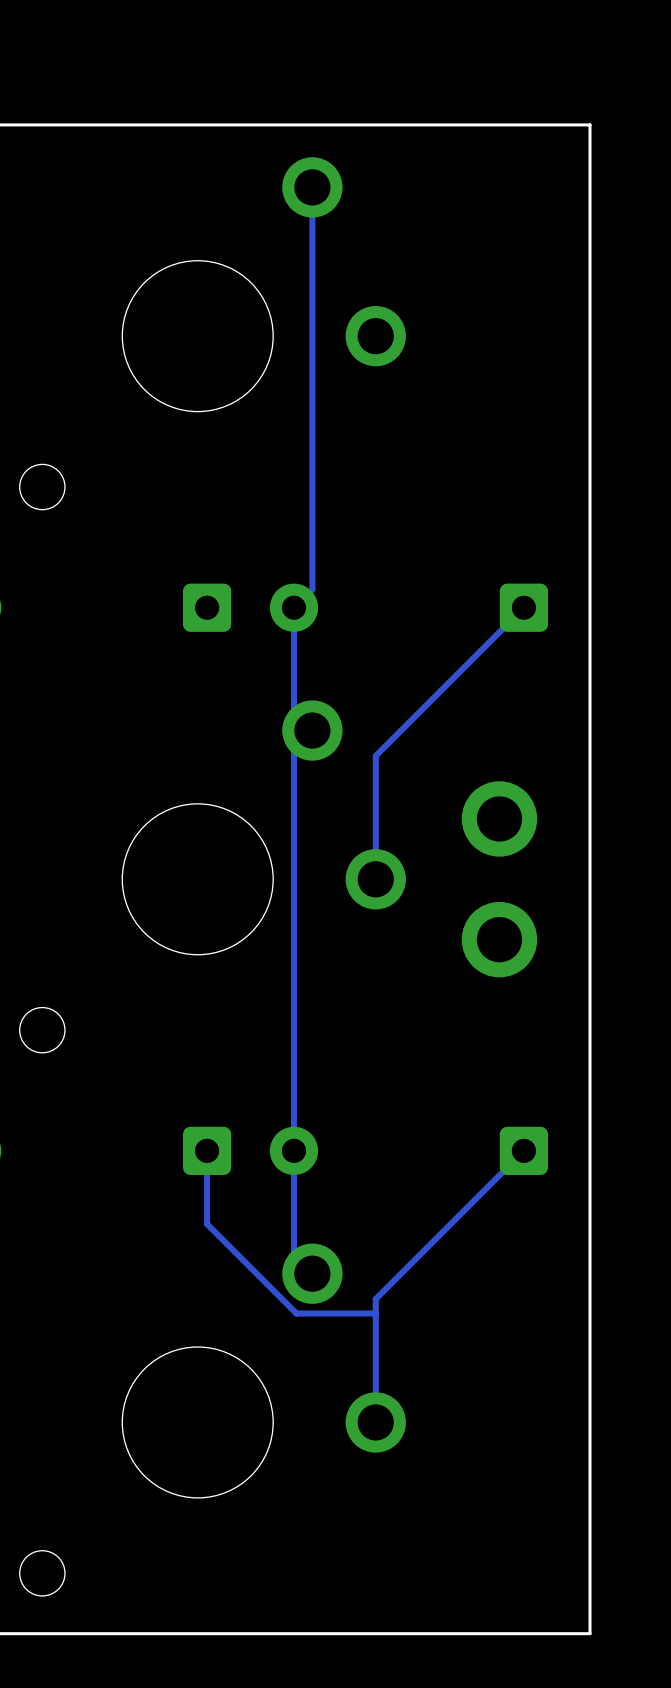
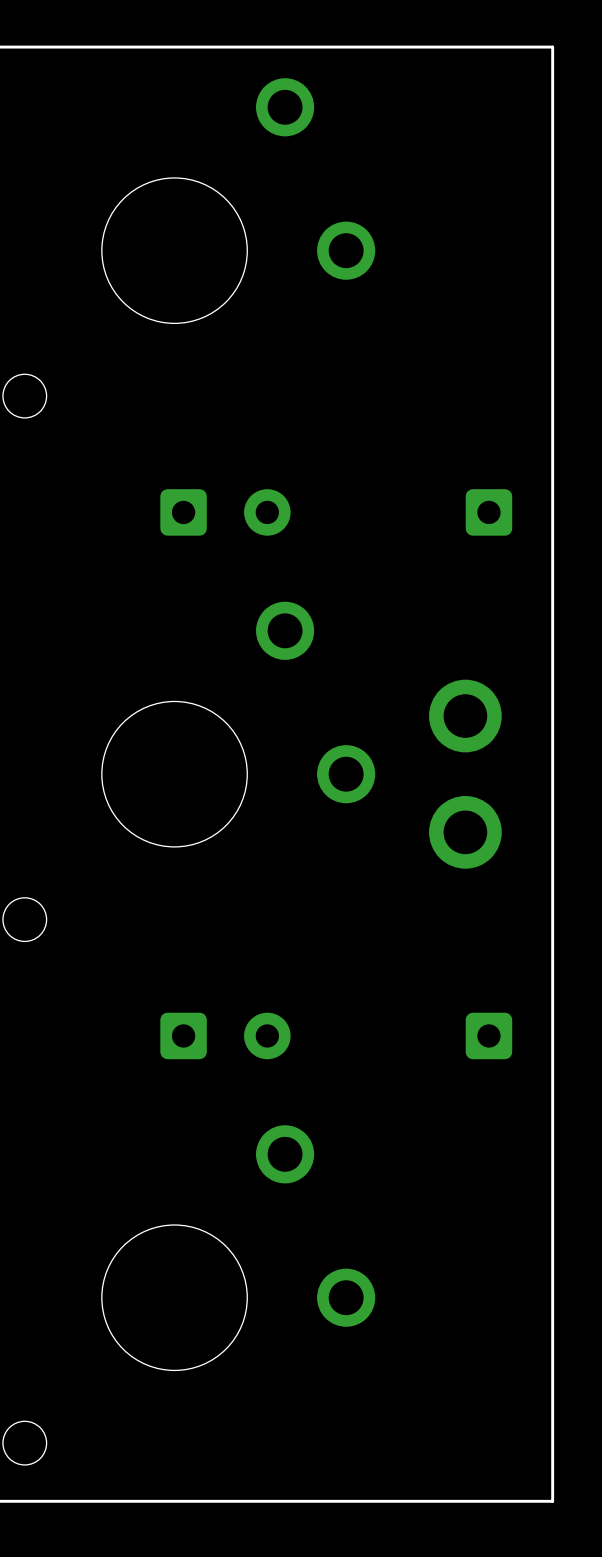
track: (312, 187) (312, 589) (293, 607) (293, 712) (312, 730) (293, 748) (293, 1255) (312, 1273) -> none
track: (523, 607) (375, 755) (375, 879) -> none
track: (207, 1150) (207, 1224) (296, 1313) (375, 1313) -> none
track: (523, 1150) (375, 1299) (375, 1422) -> none

